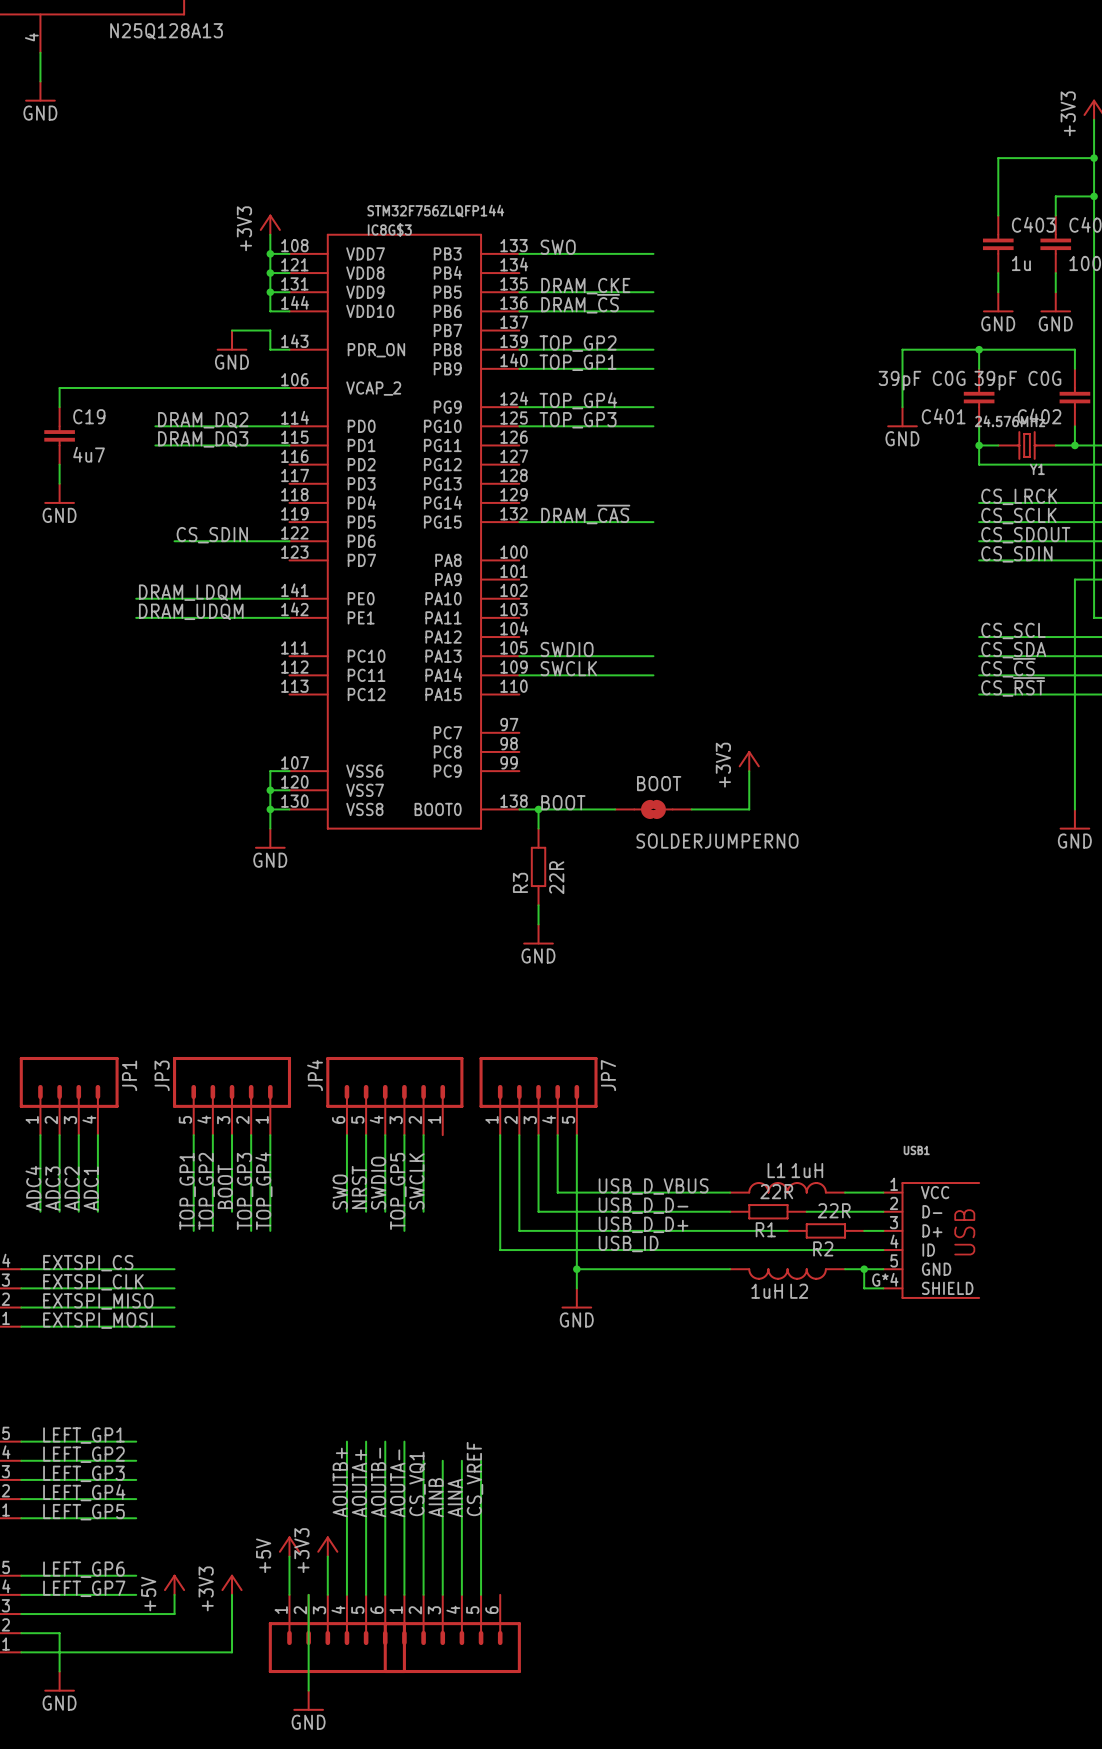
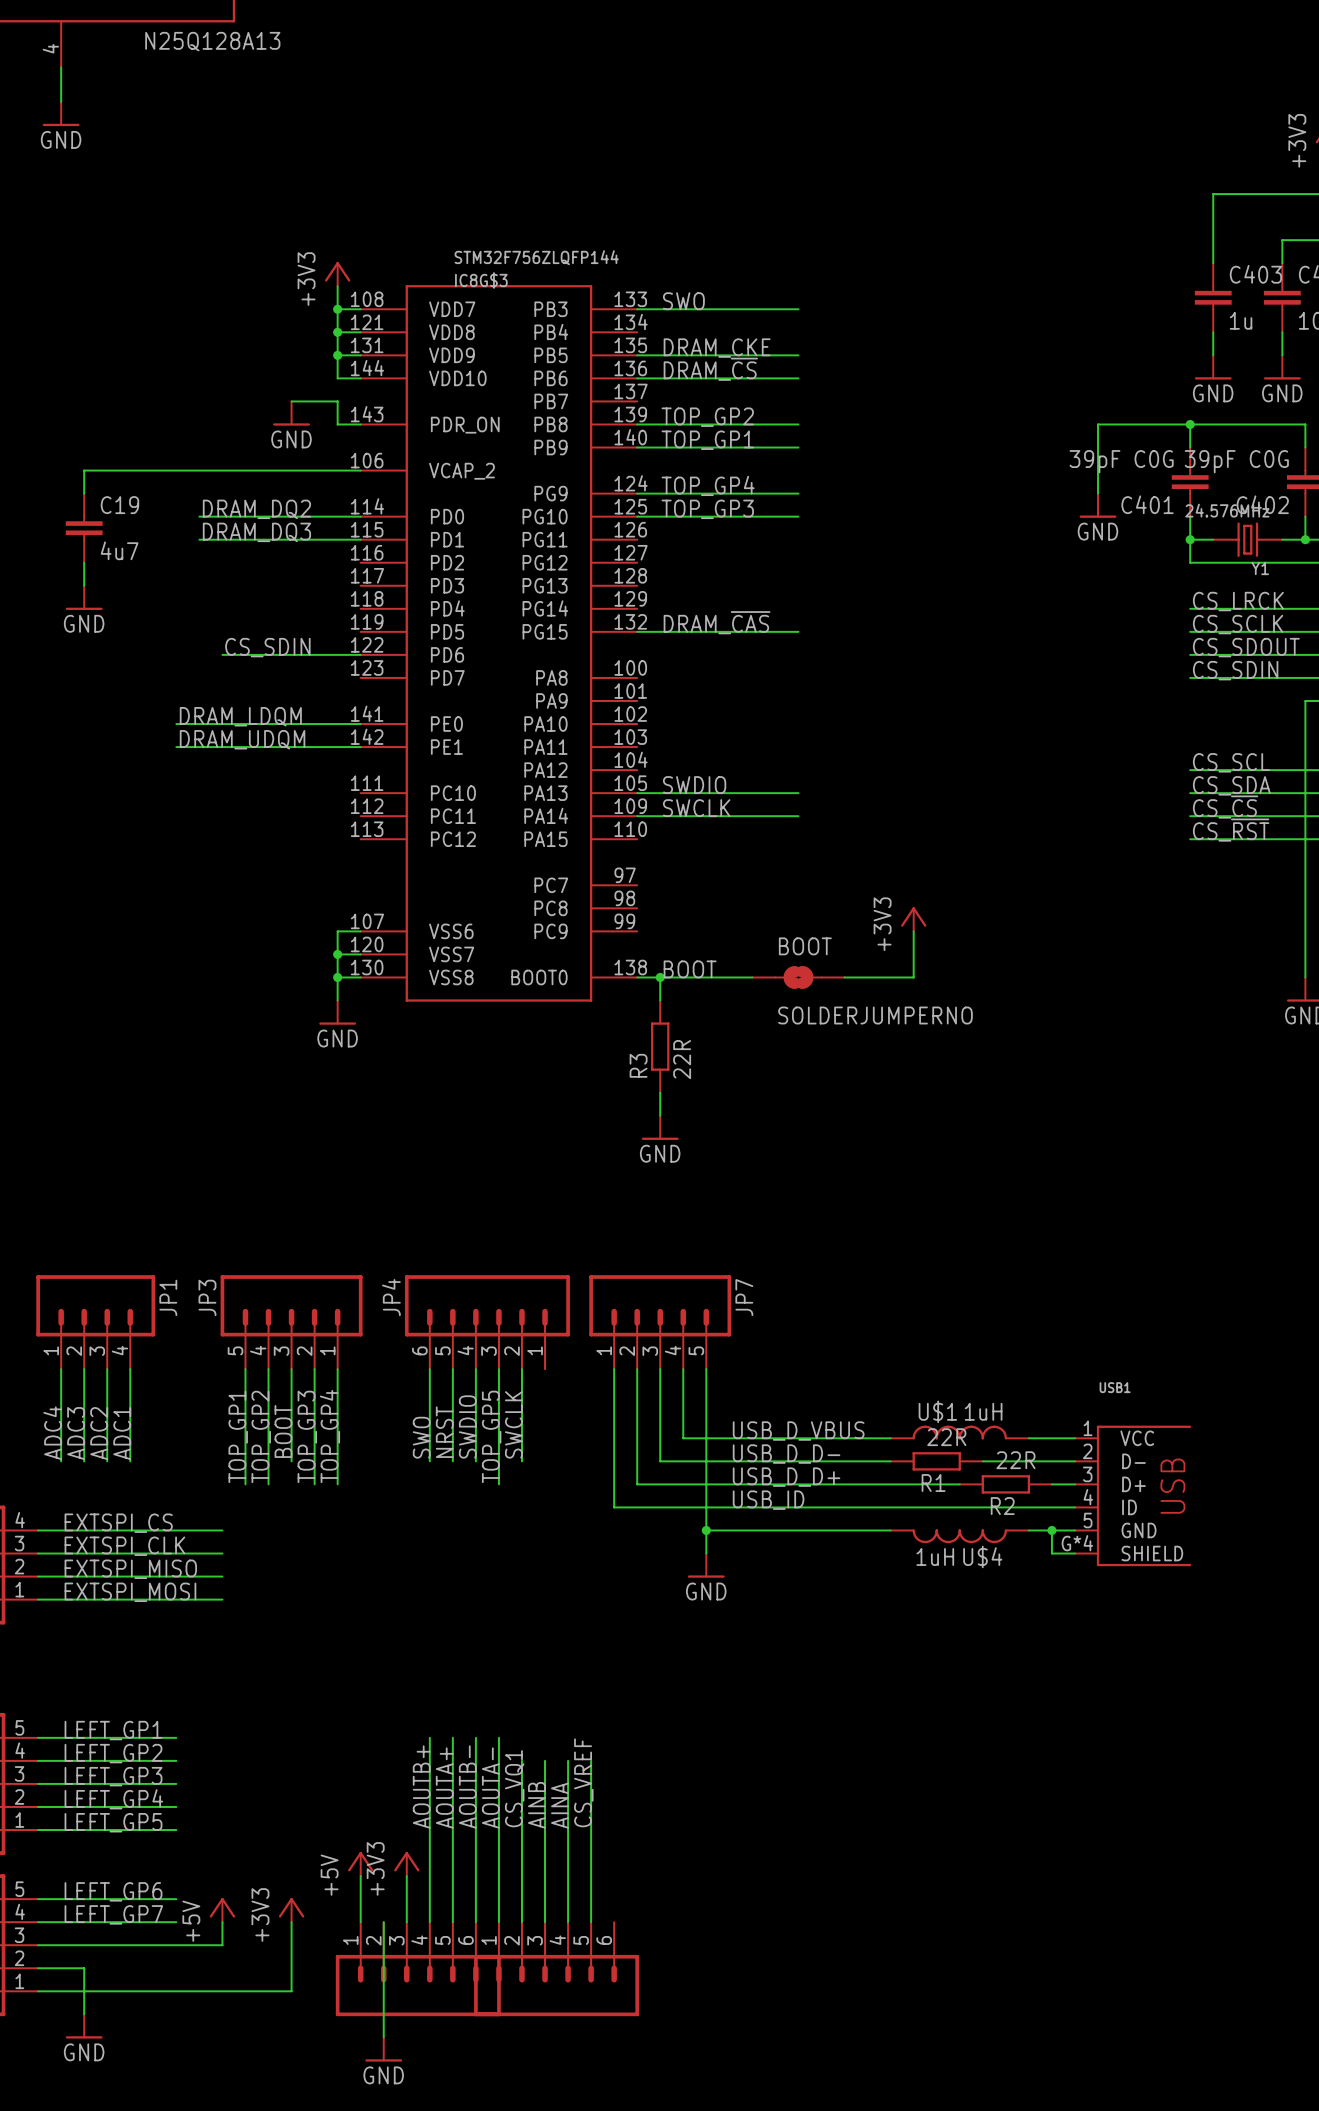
L1 name: L1 (776, 1170) -> U$1 (937, 1411)
L2 name: L2 (799, 1291) -> U$4 (982, 1556)

